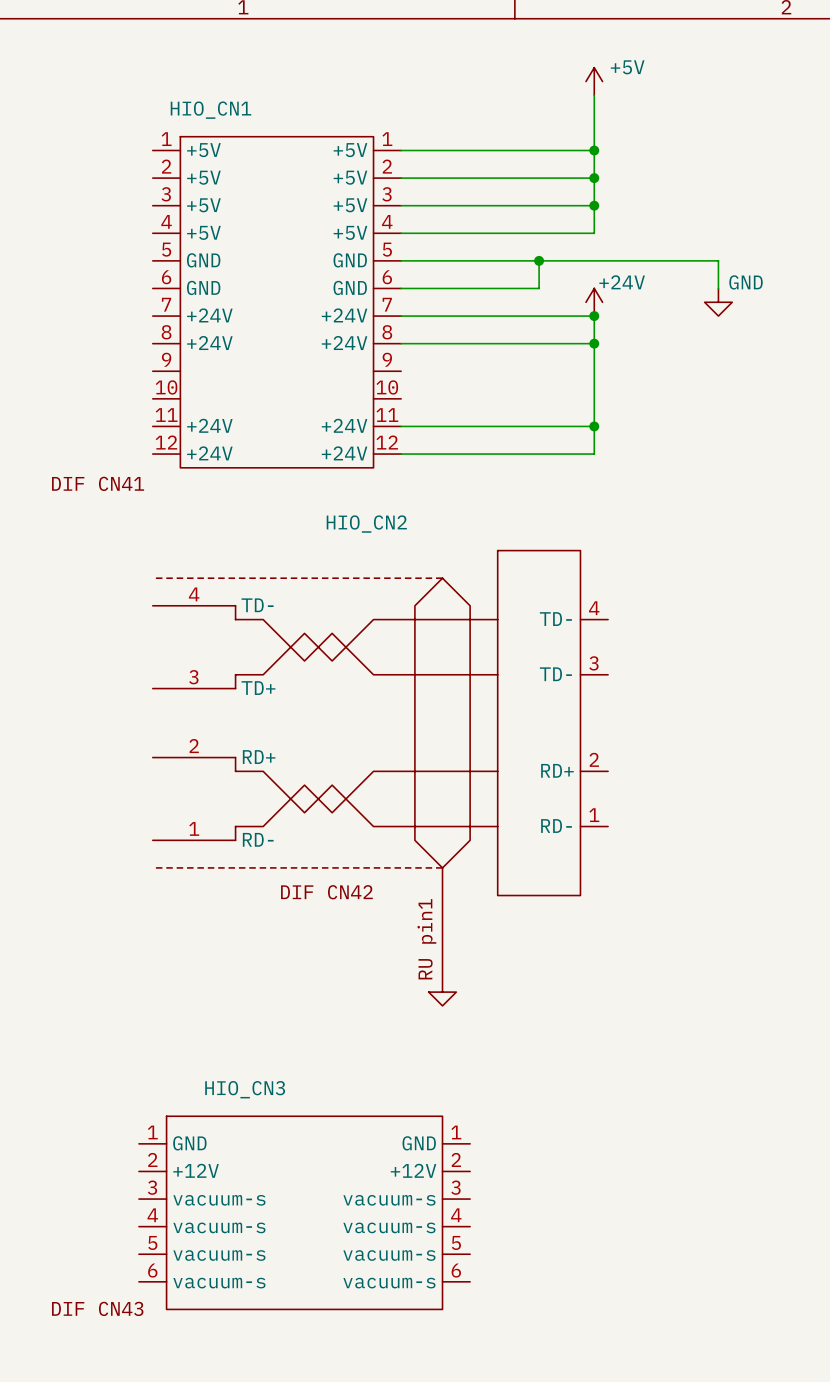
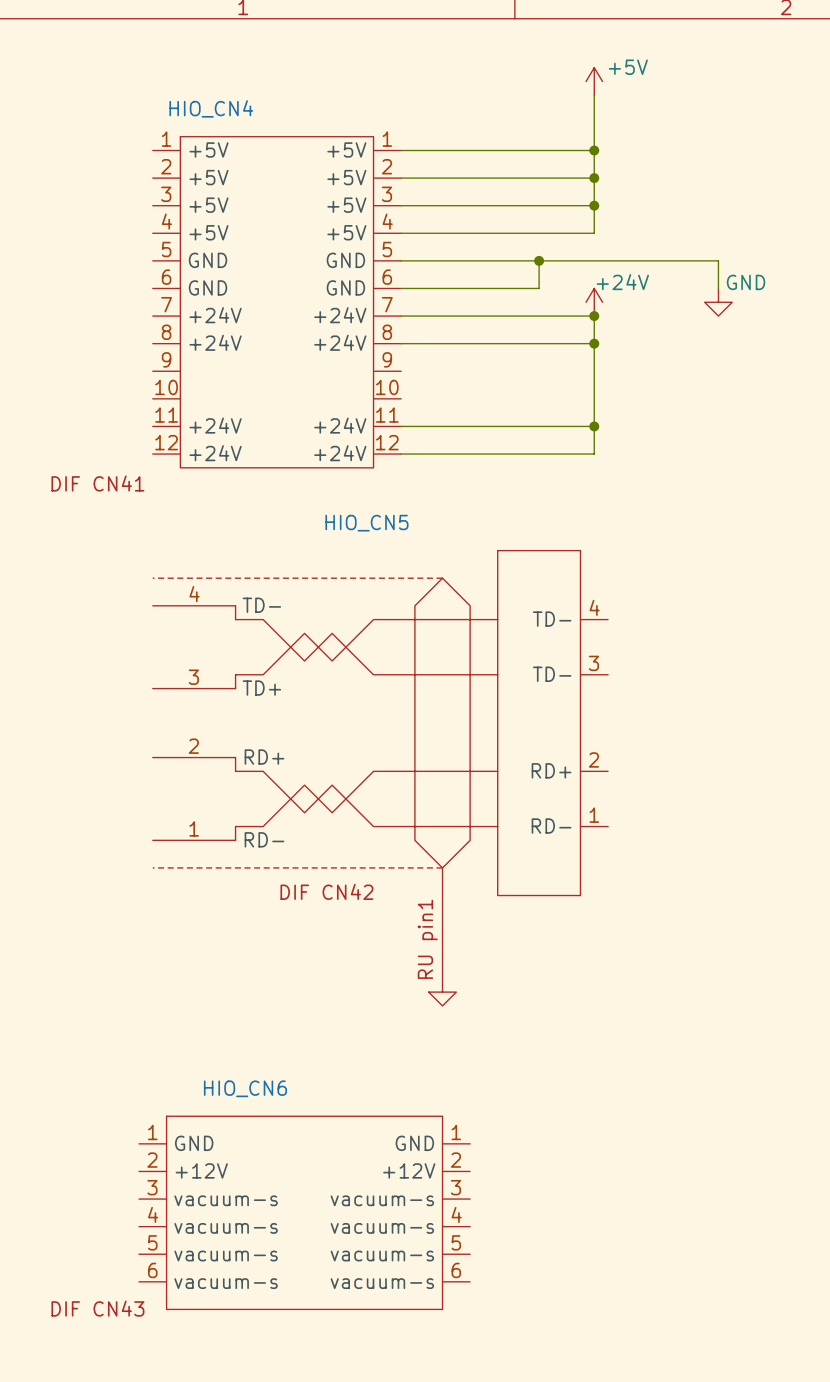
HIO_CN1 name: HIO_CN1 (210, 110) -> HIO_CN4 (211, 108)
HIO_CN2 name: HIO_CN2 (366, 524) -> HIO_CN5 (366, 523)
HIO_CN3 name: HIO_CN3 (245, 1089) -> HIO_CN6 (245, 1088)

